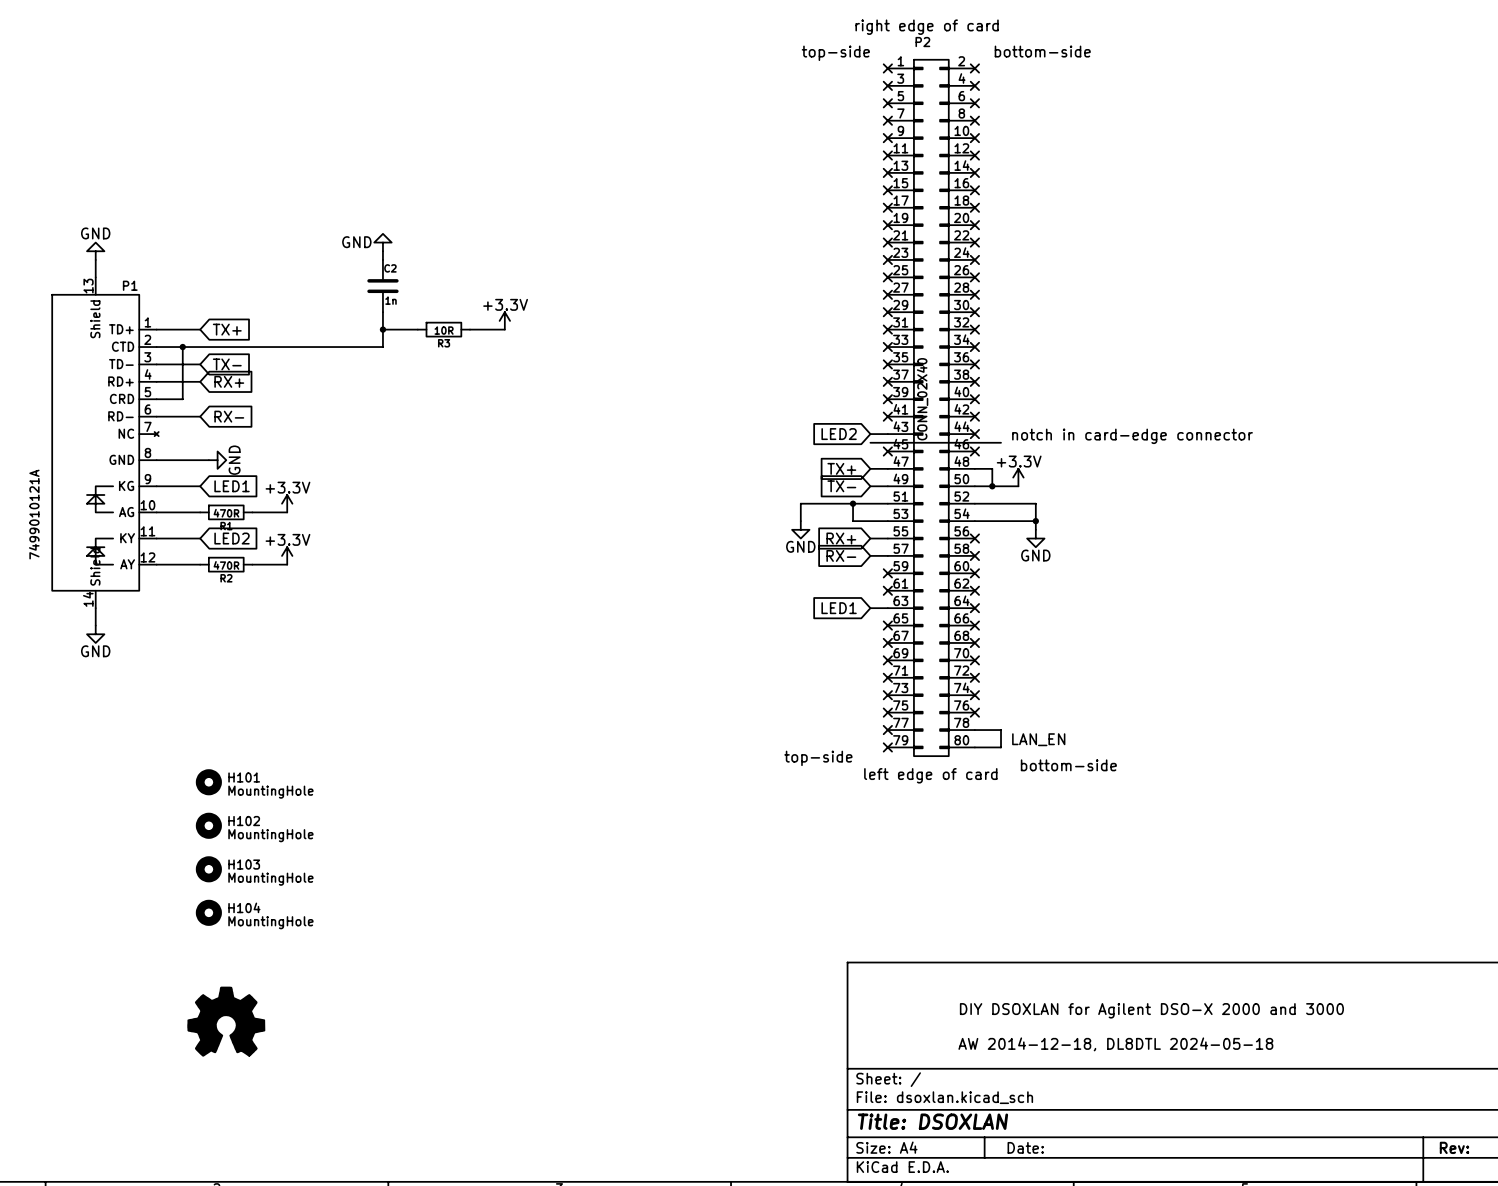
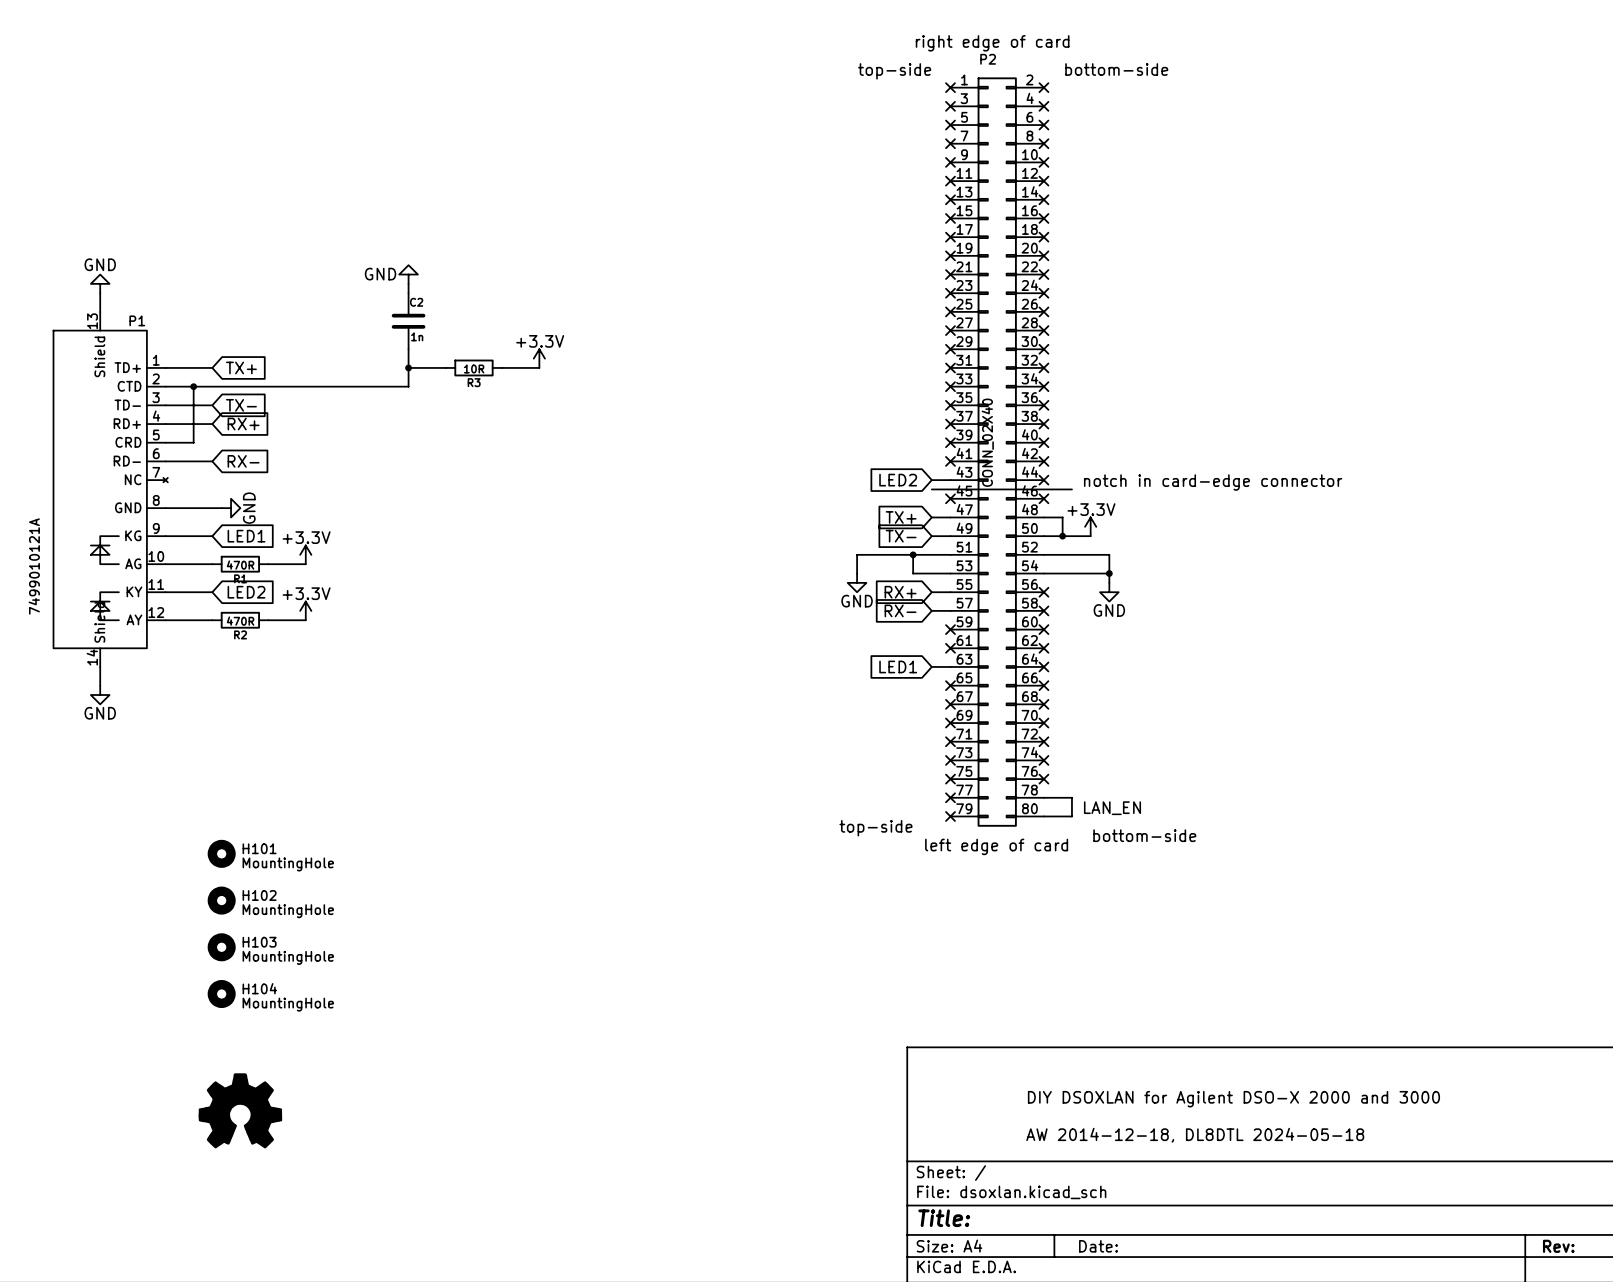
title block: Title: DSOXLAN (932, 1121) -> Title: (944, 1218)

